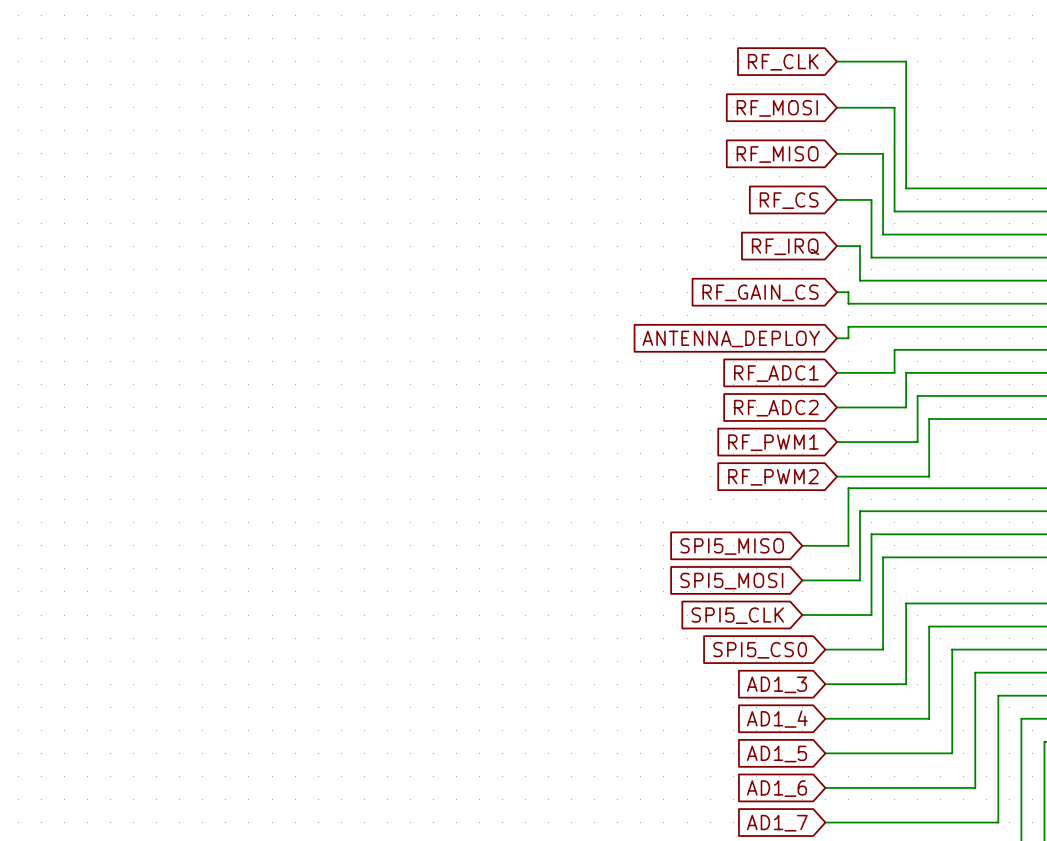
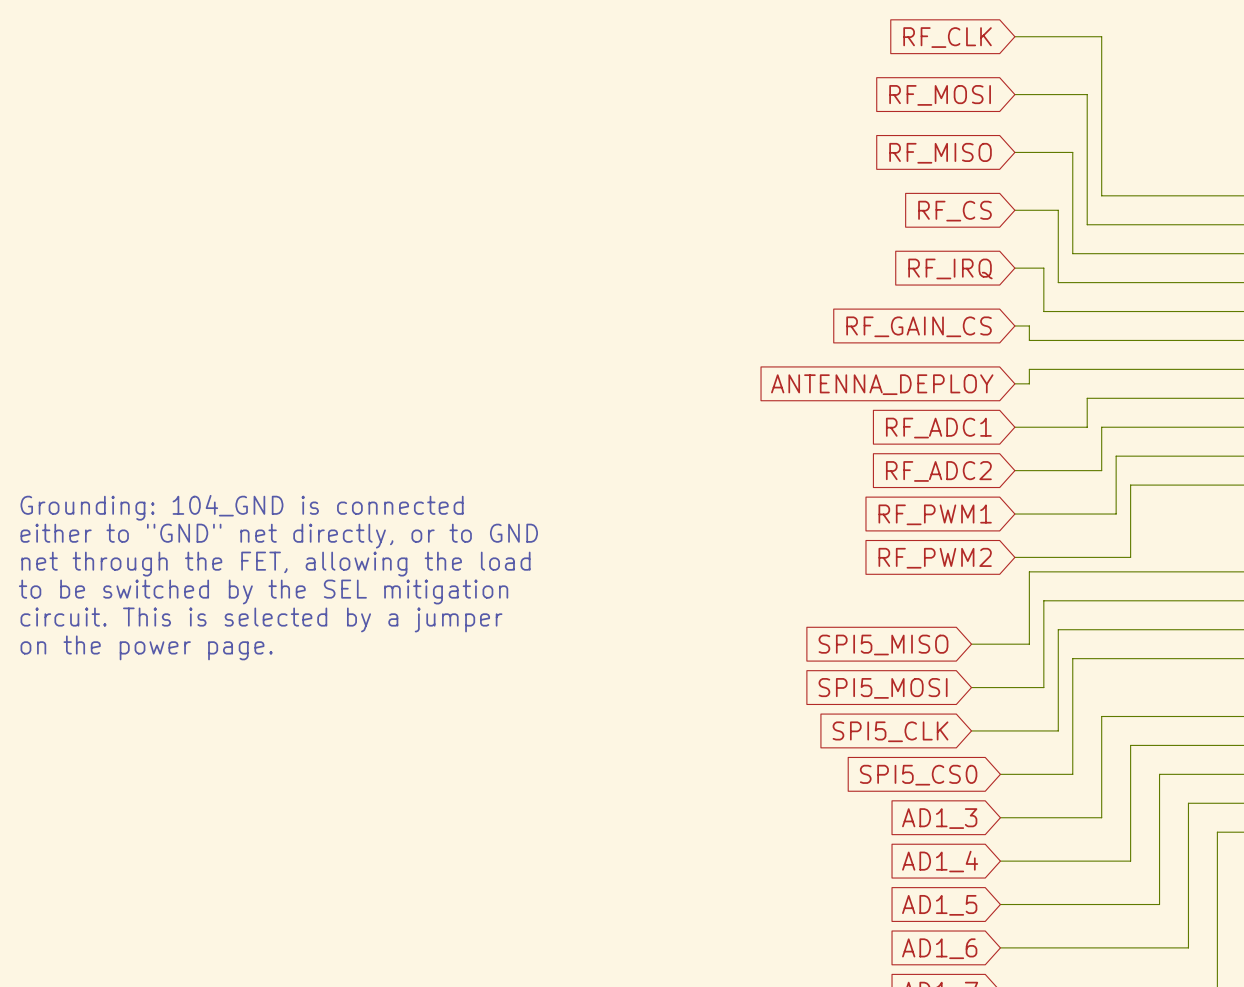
text: none -> Grounding: 104_GND is connected (242, 507)
text: none -> either to "GND" net directly, or to GND (279, 536)
text: none -> net through the FET, allowing the load (275, 564)
text: none -> to be switched by the SEL mitigation (263, 592)
text: none -> circuit. This is selected by a jumper (261, 619)
text: none -> on the power page. (146, 647)

